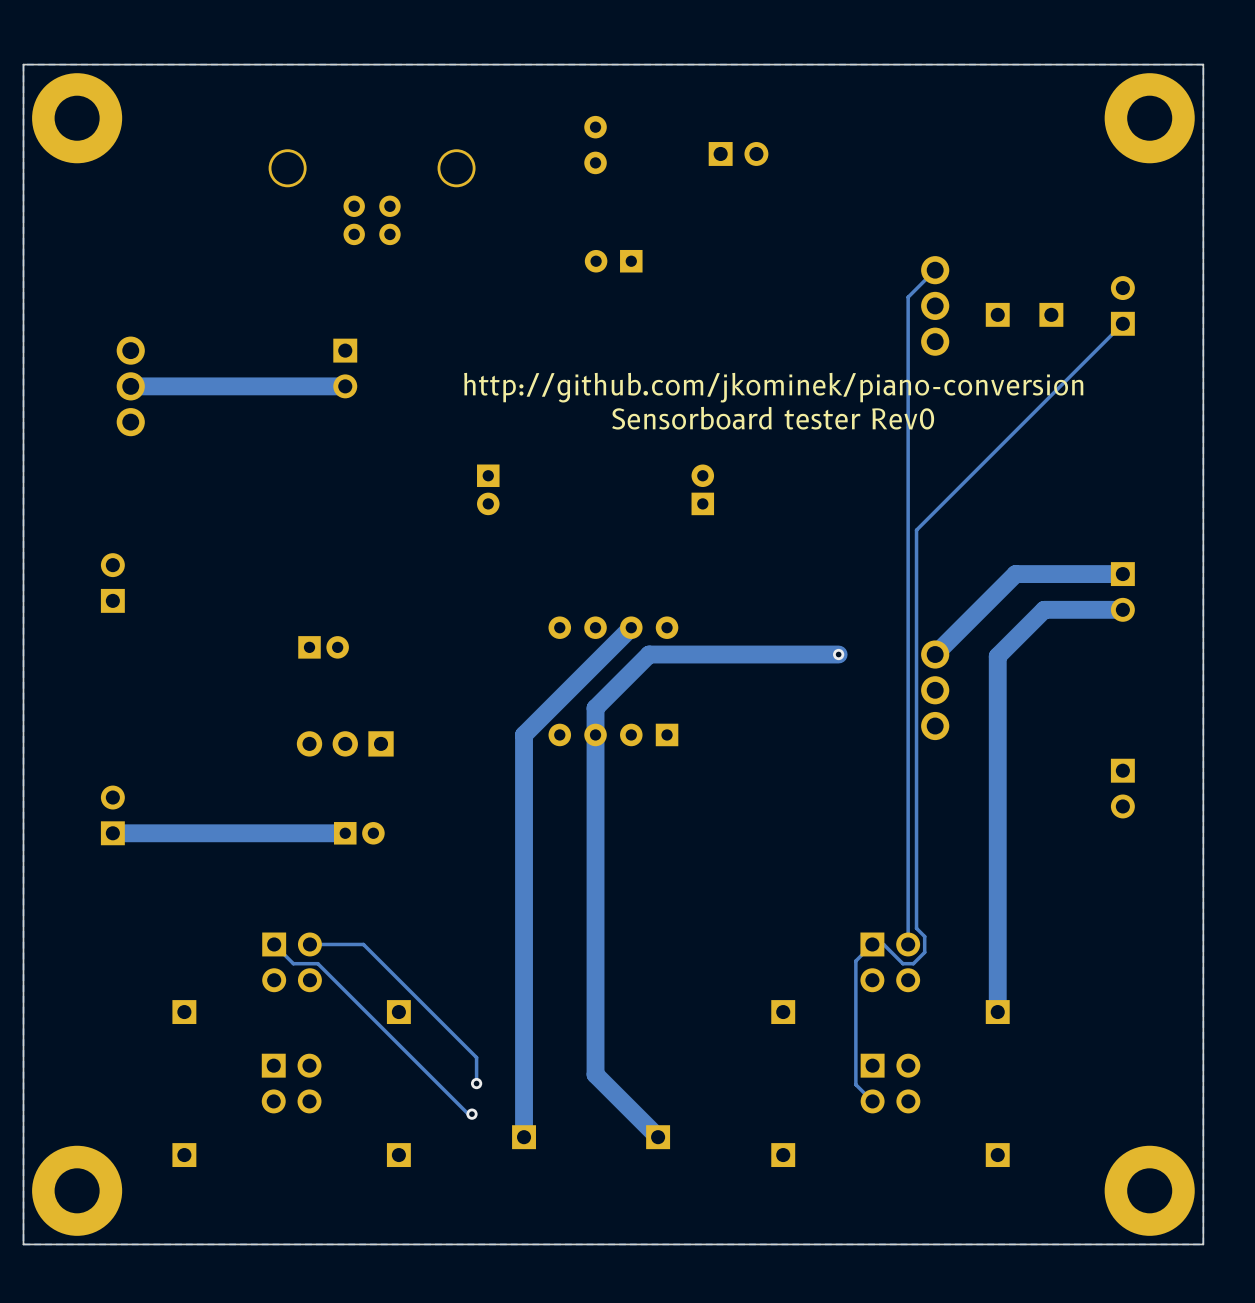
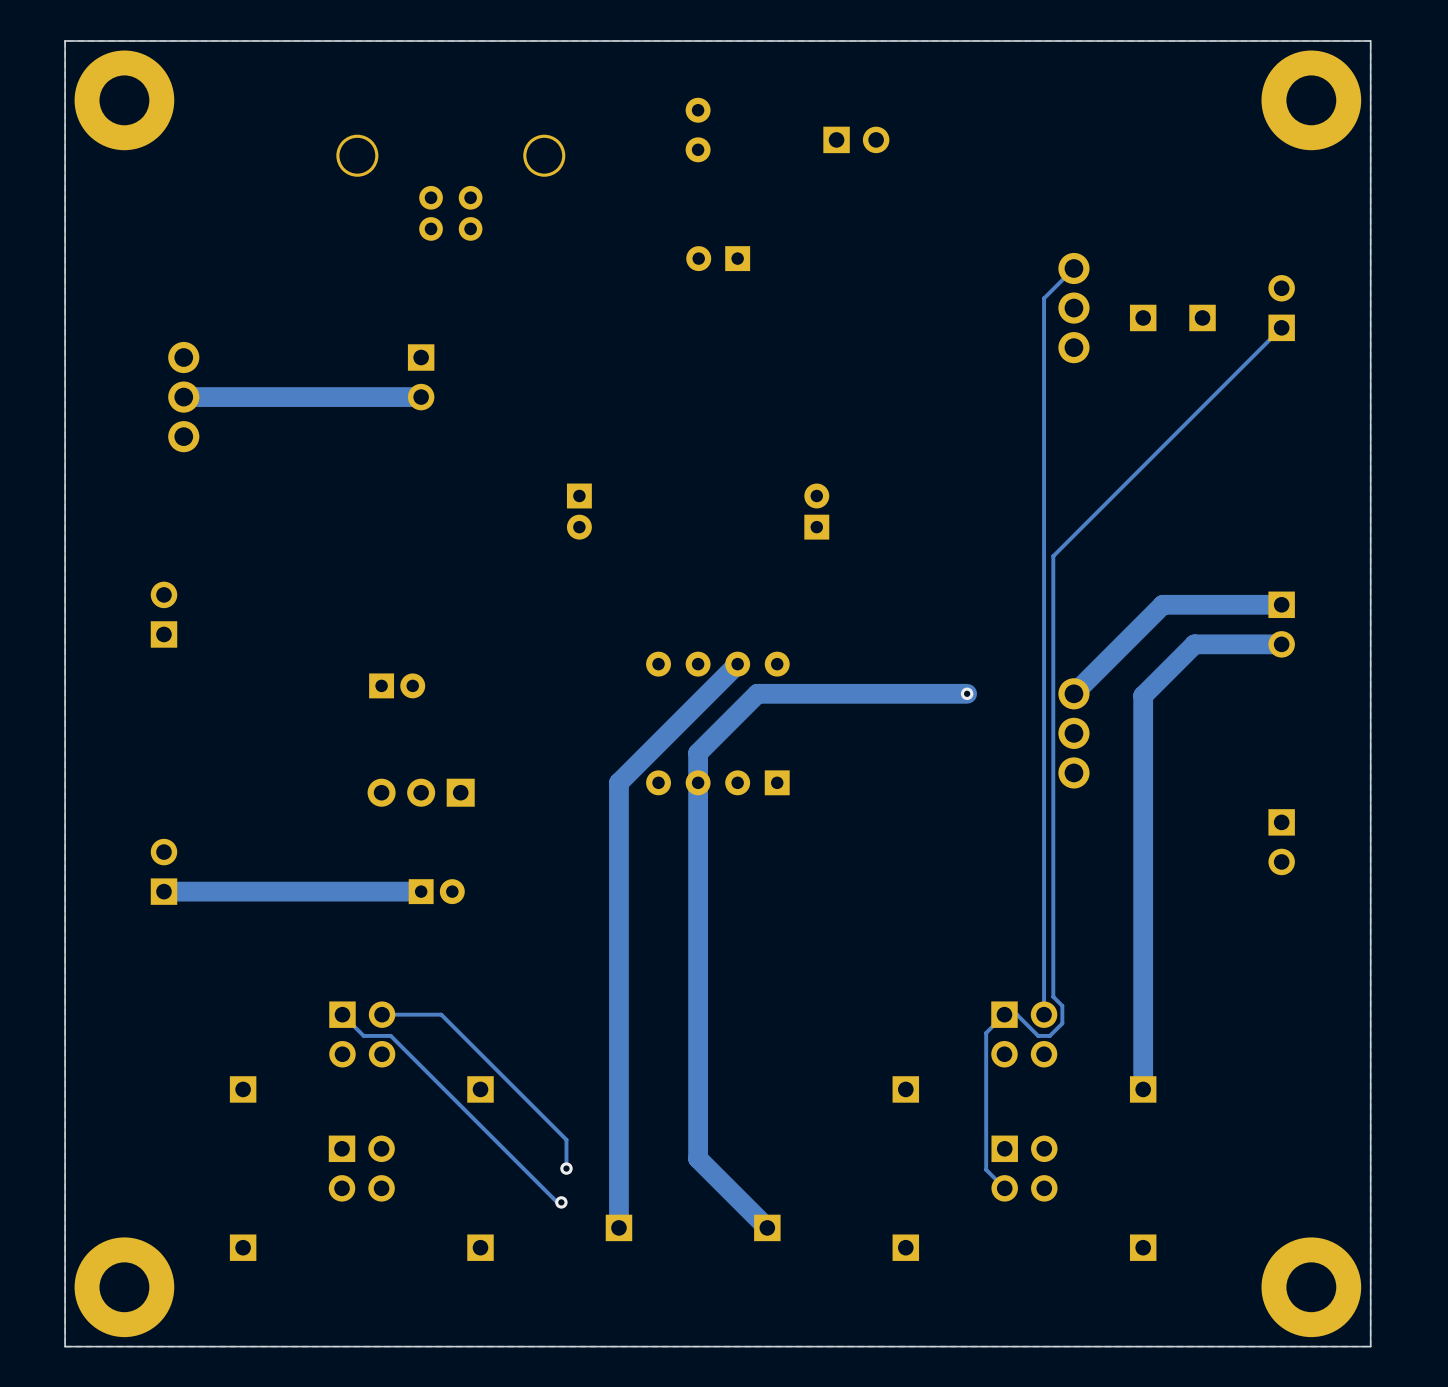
text: http://github.com/jkominek/piano-conversion (773, 387) -> none
text: Sensorboard tester Rev0 (773, 418) -> none

